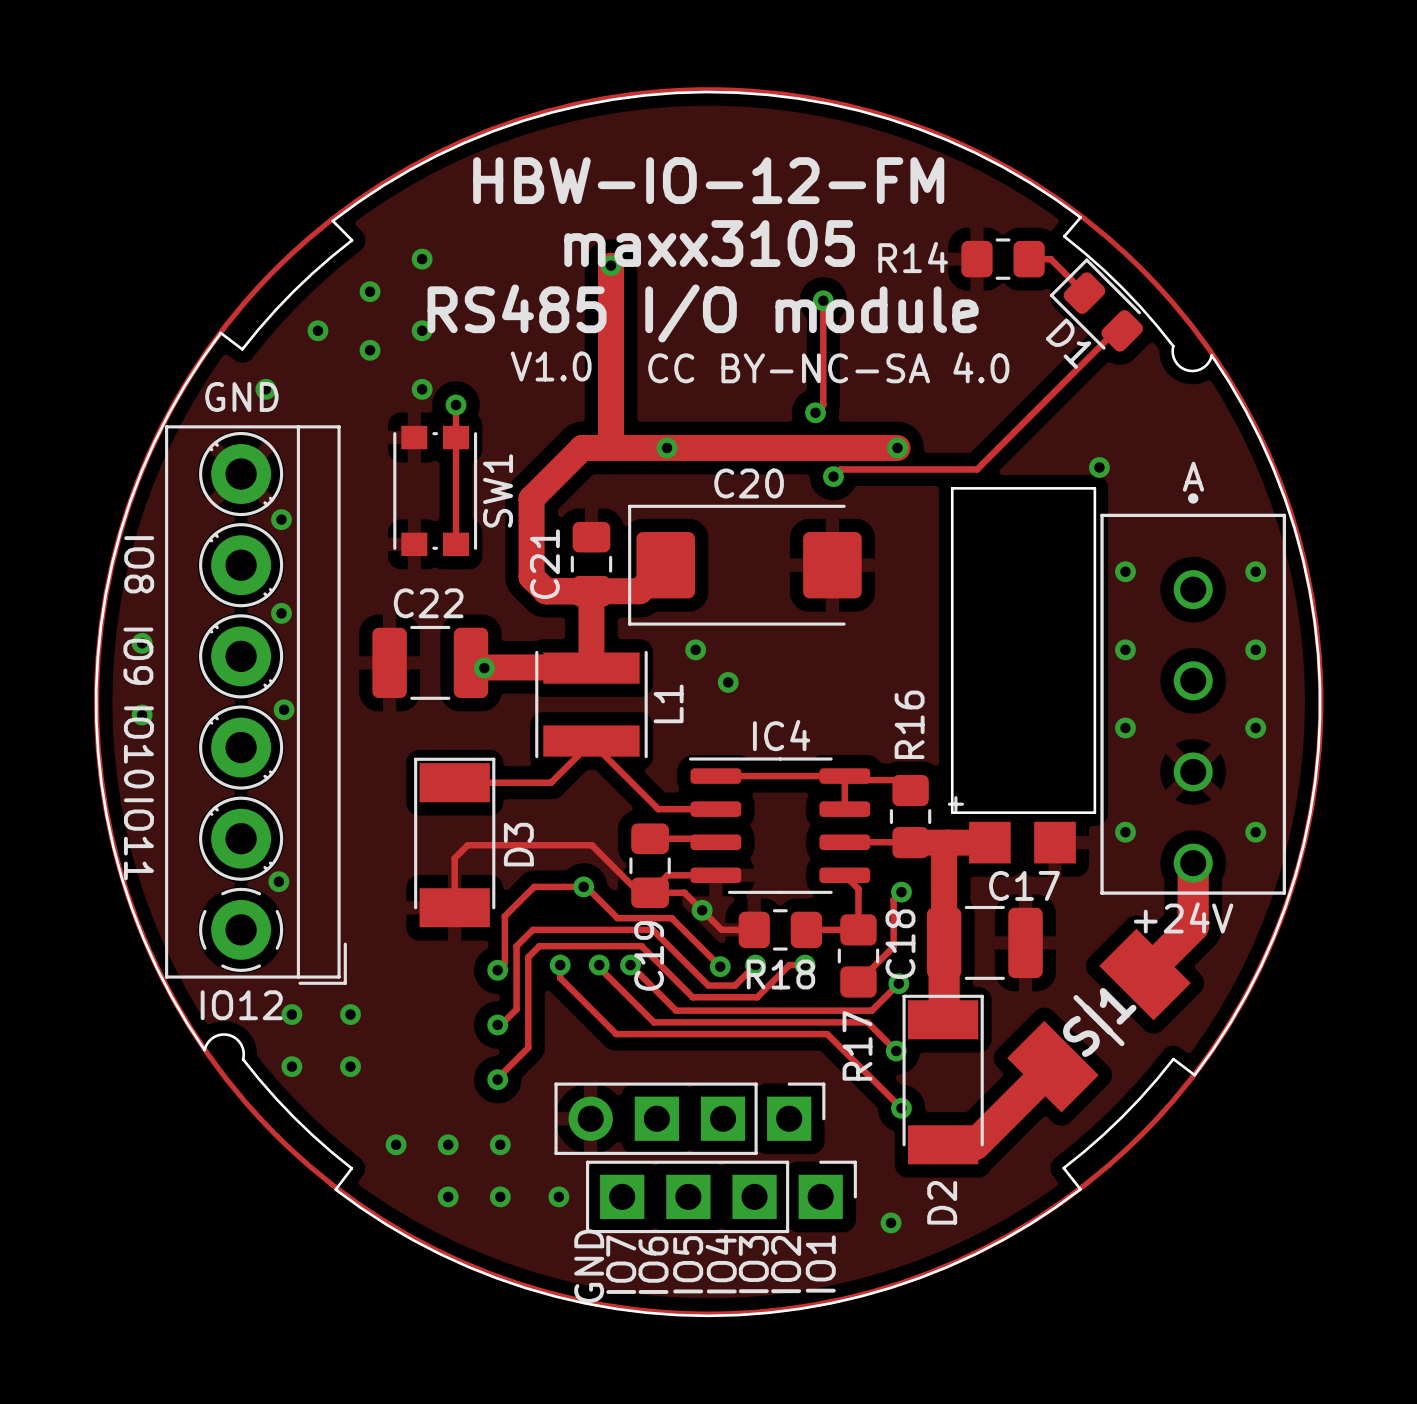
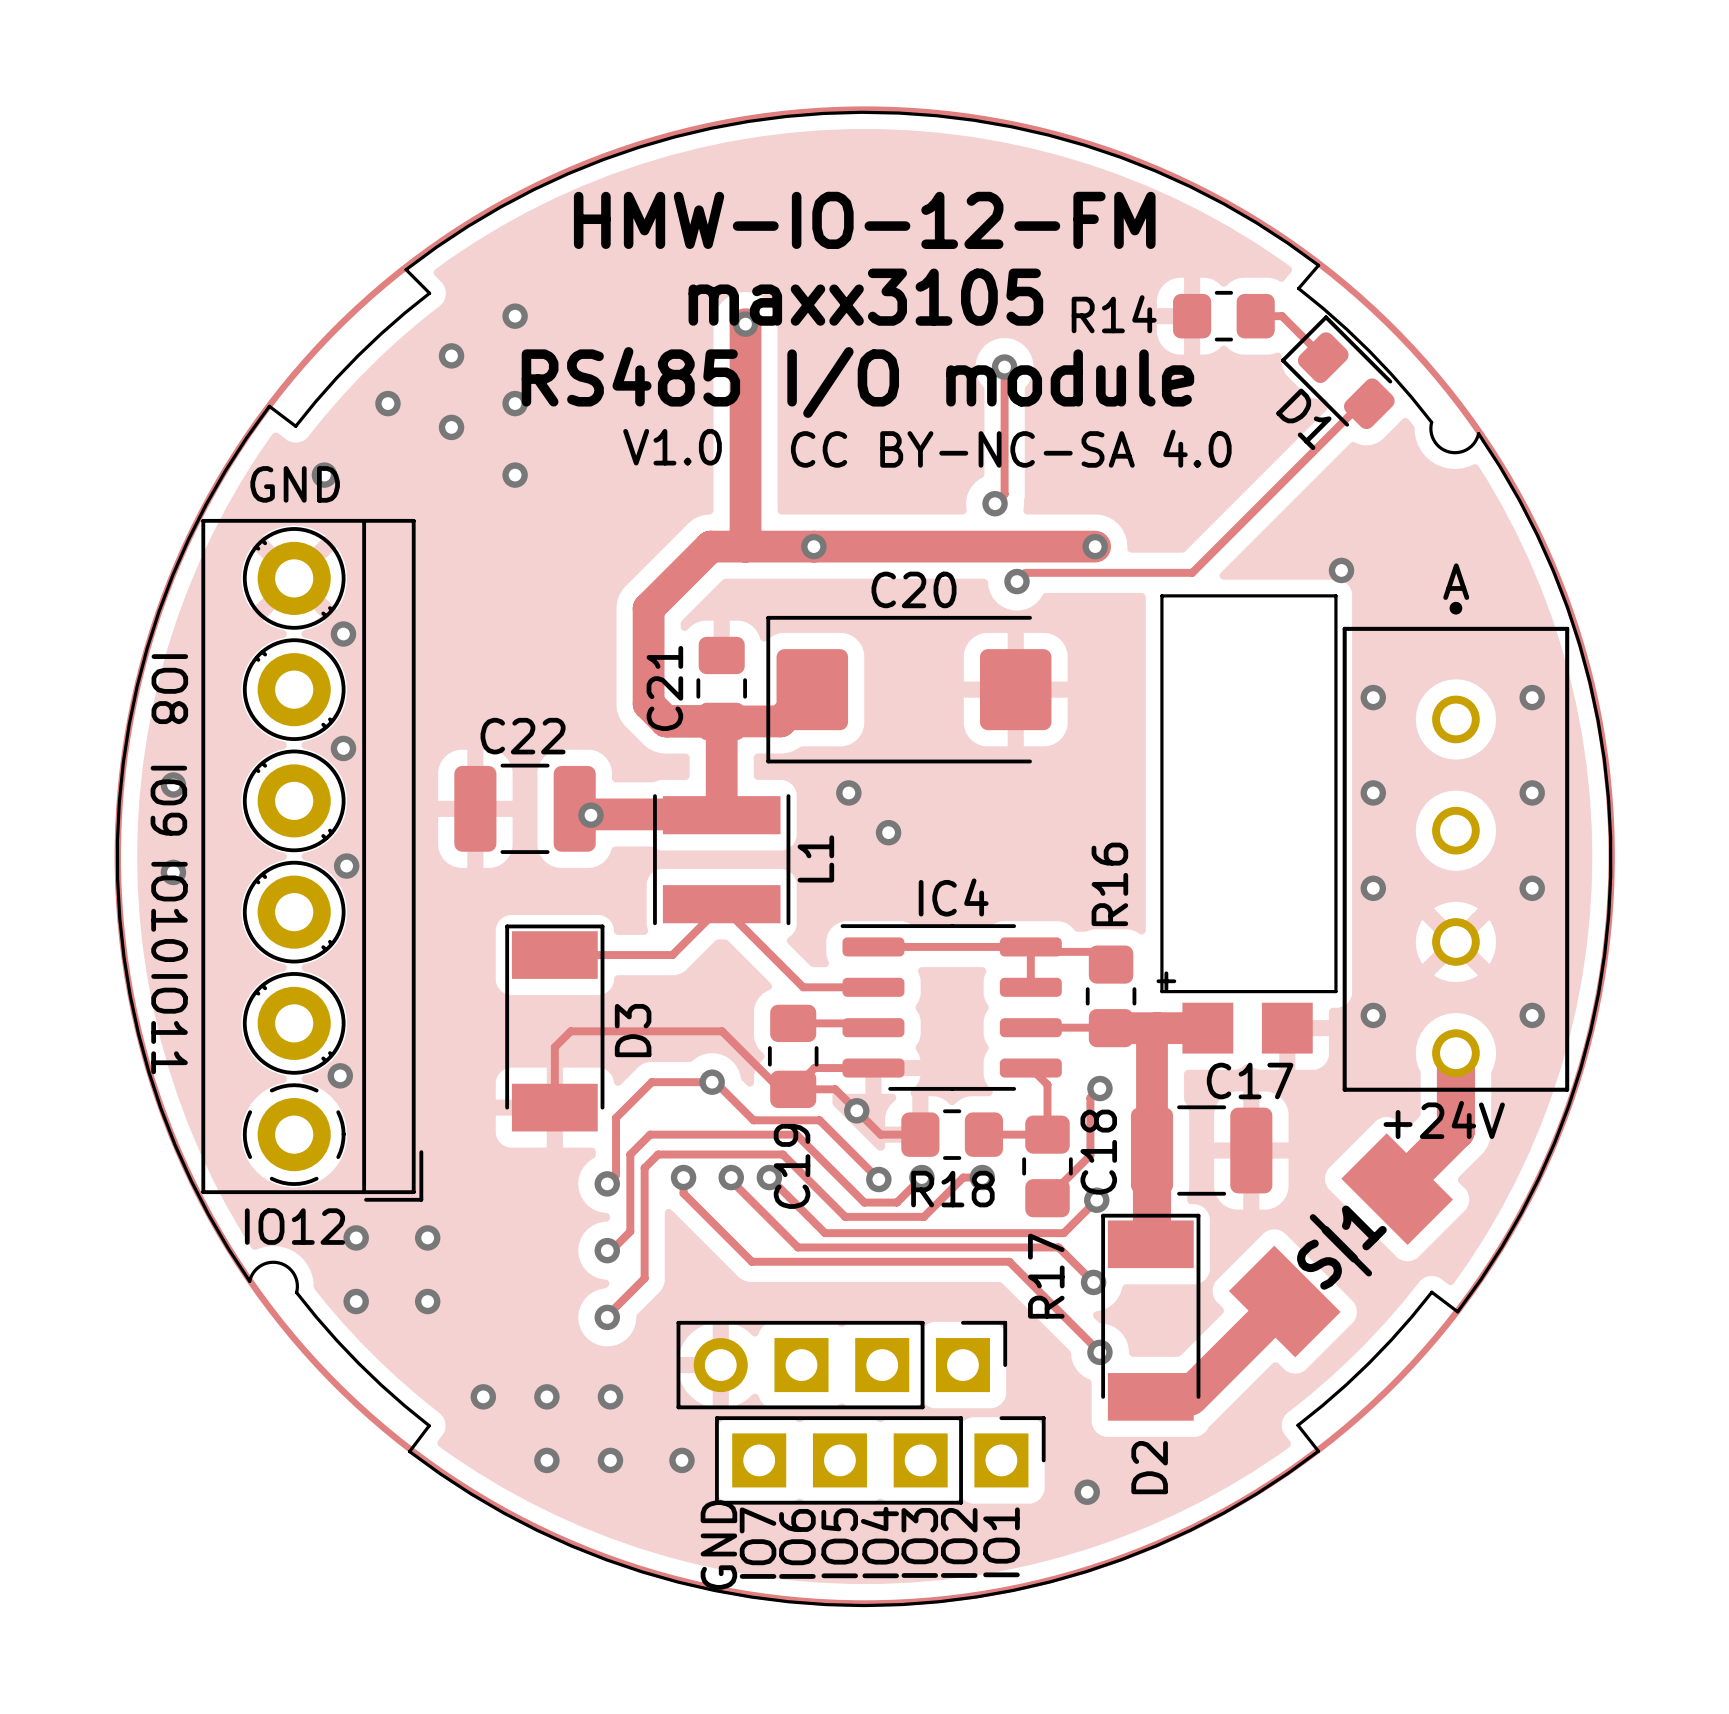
text: HBW-IO-12-FM (708, 180) -> HMW-IO-12-FM (864, 220)
track: (456, 404) (456, 544) -> none
via: (456, 404) -> none
SW1: (435, 490) -> none

